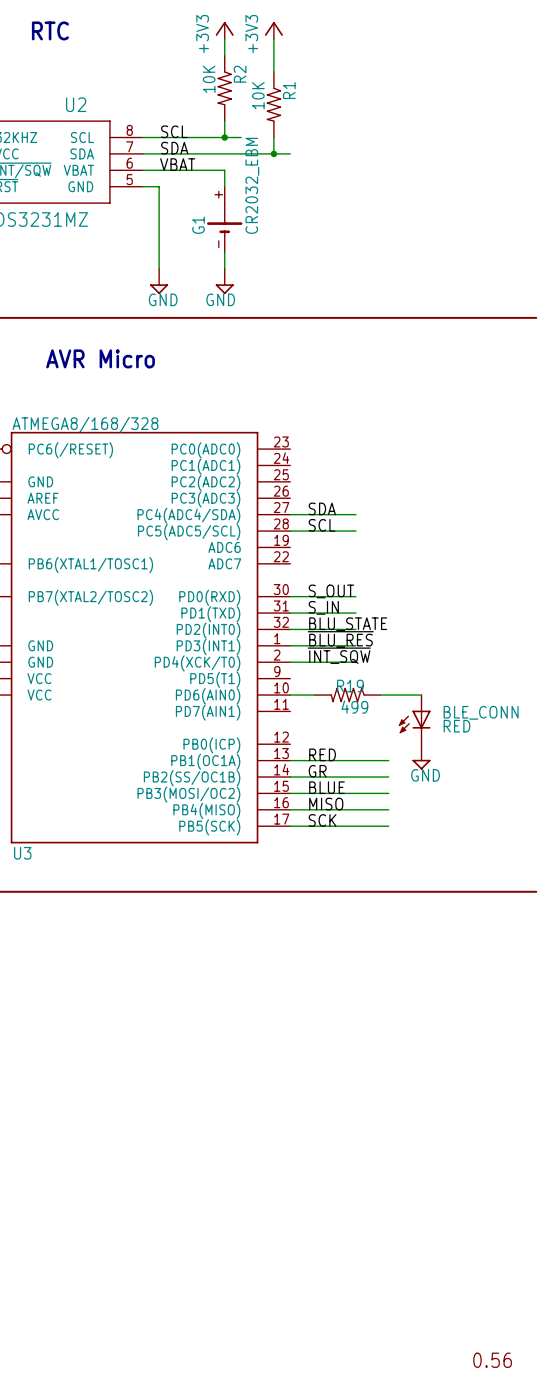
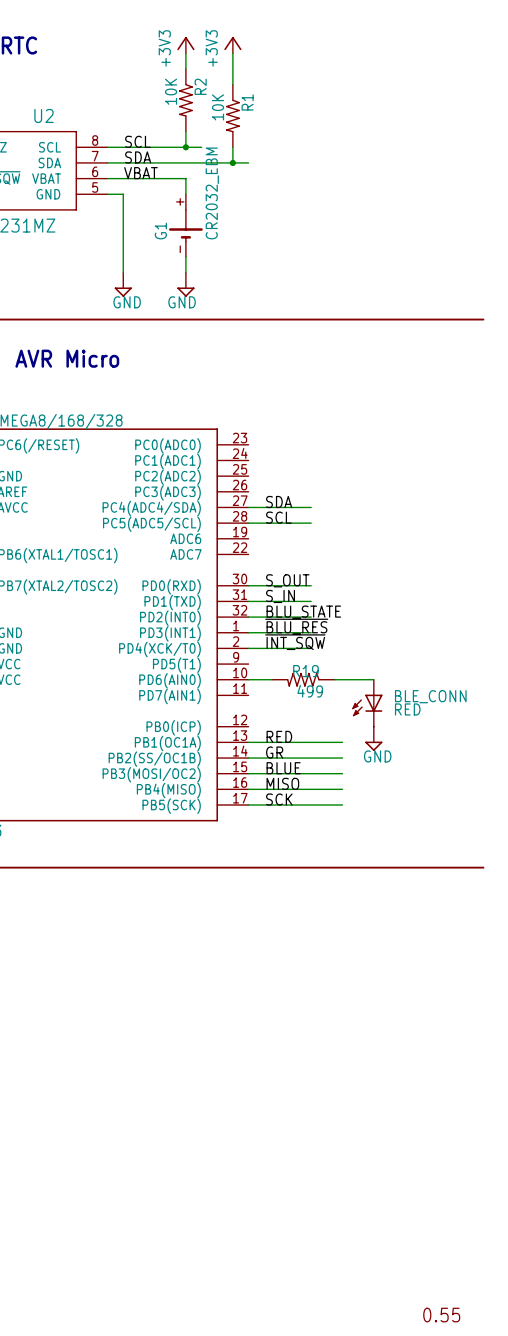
text: 0.56 (492, 1360) -> 0.55 (441, 1315)

